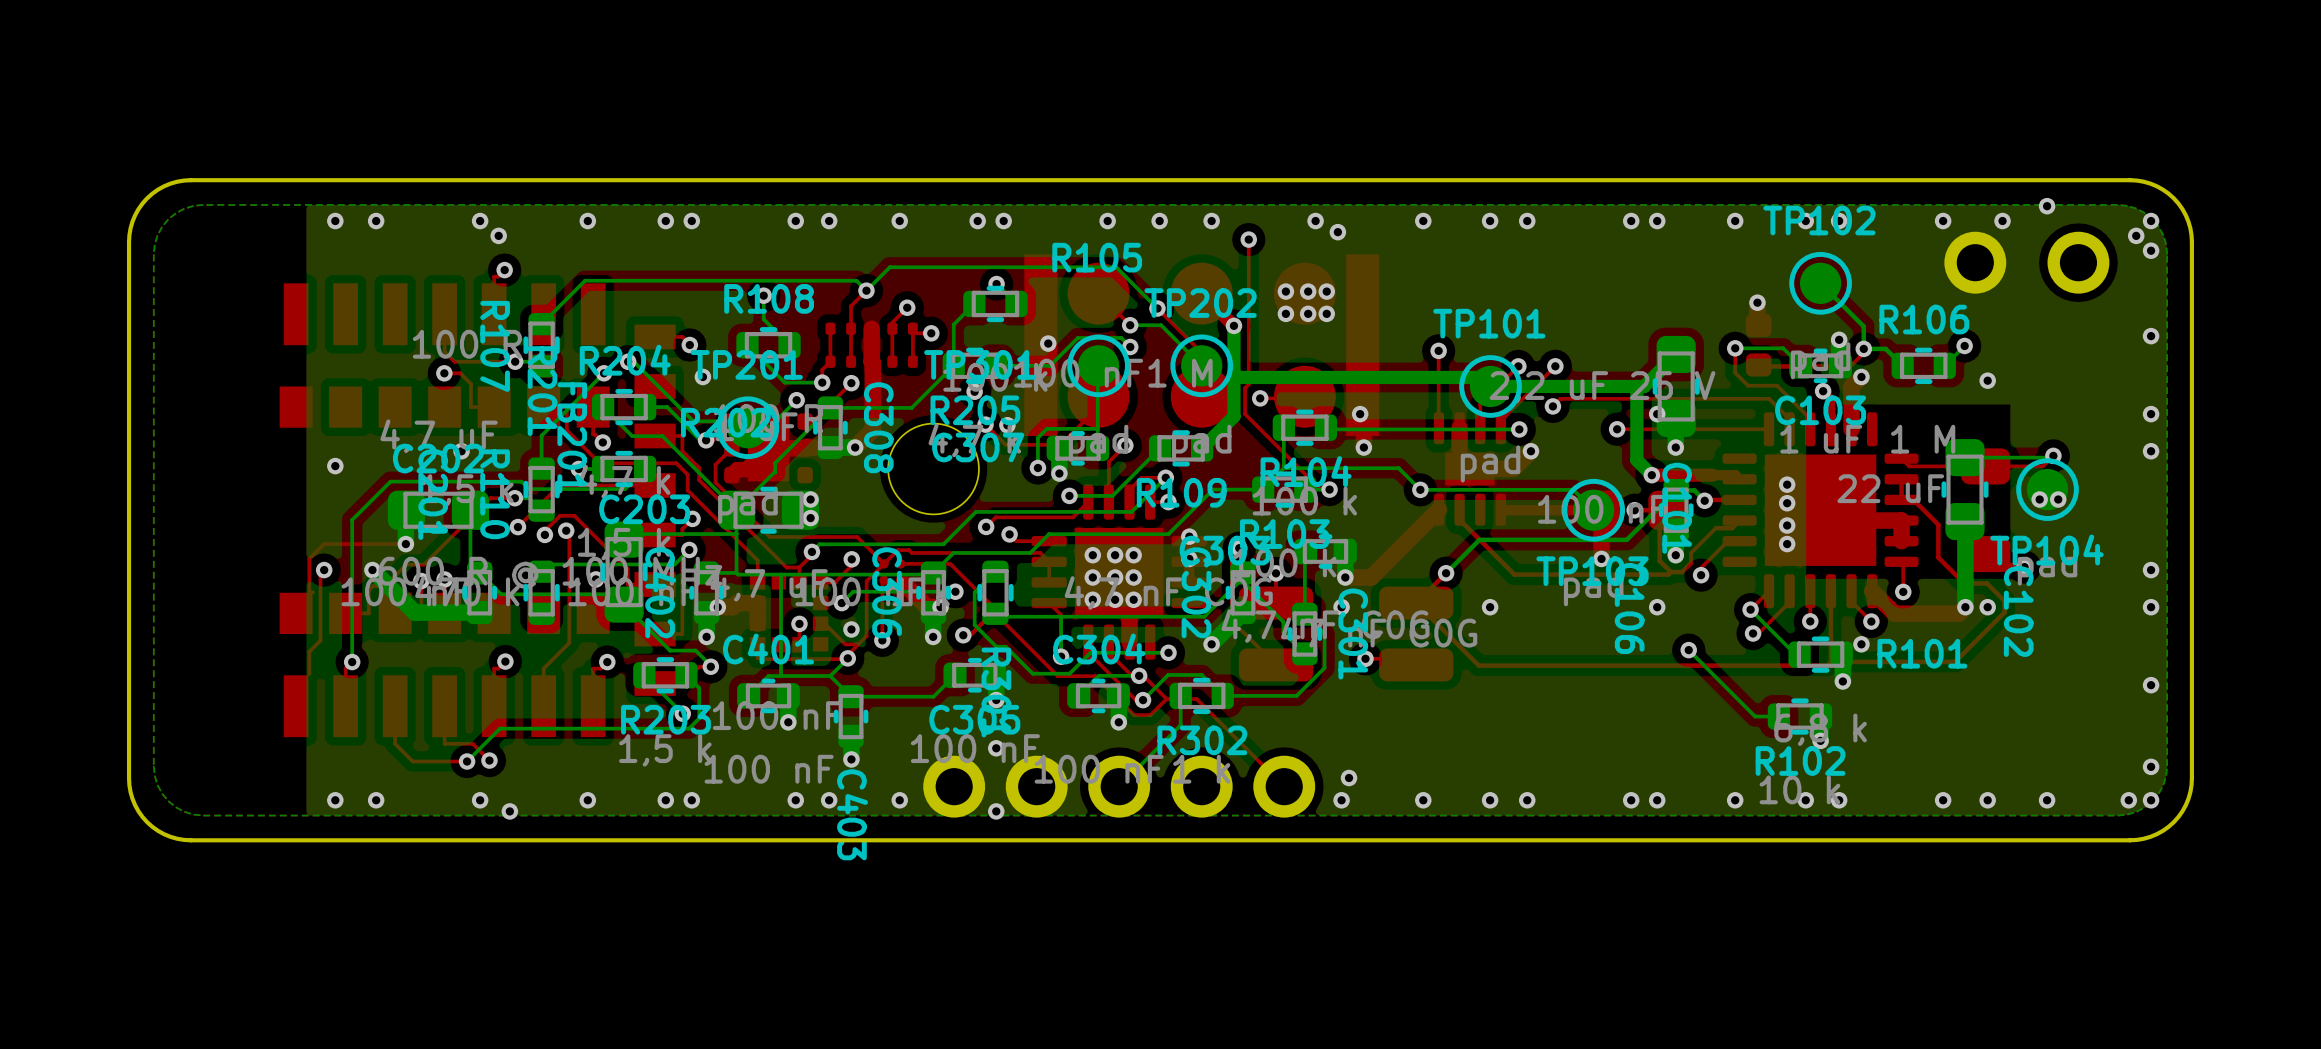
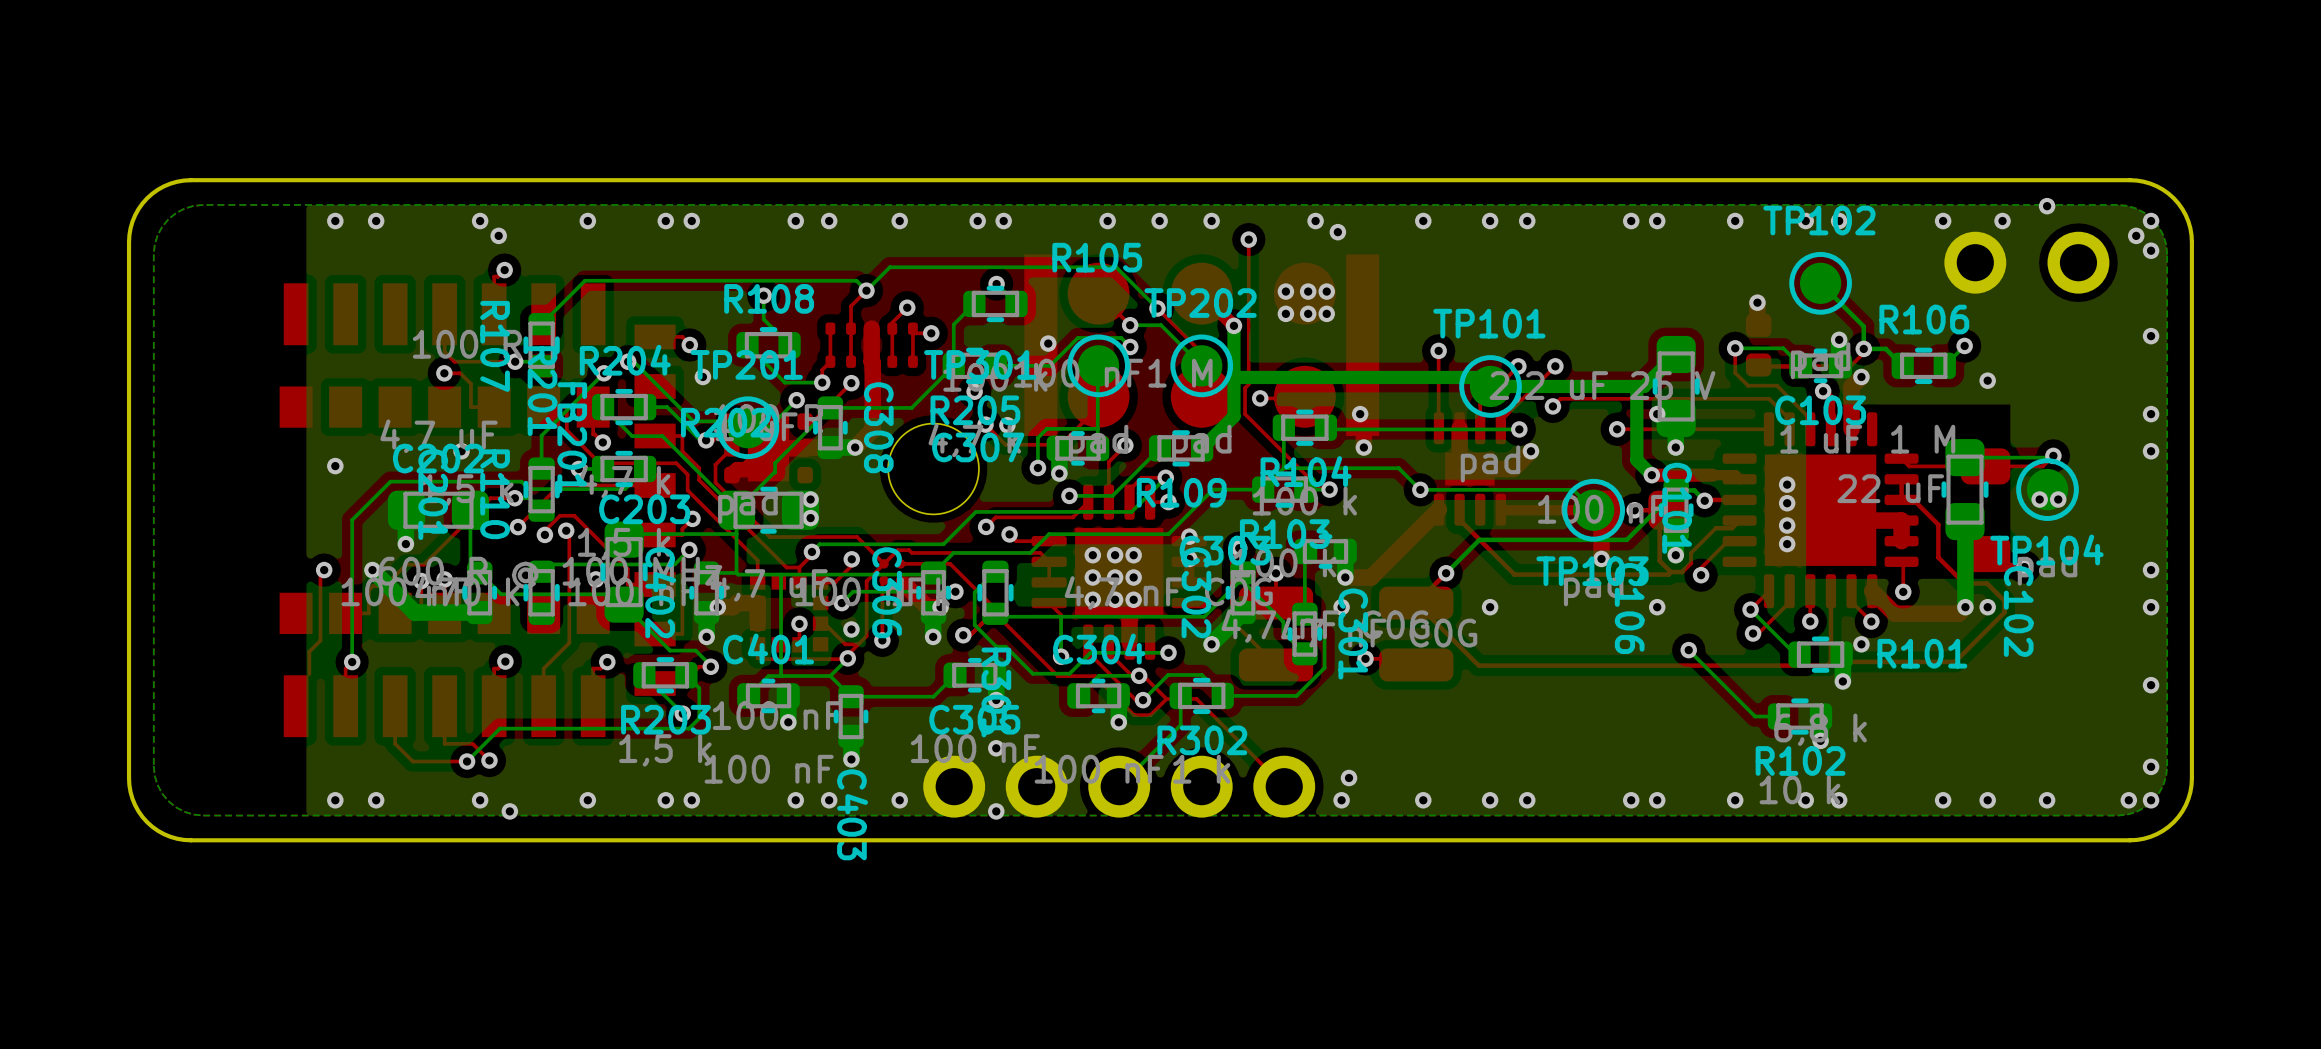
top track: (405, 544) (324, 544) (309, 558) (309, 592) (313, 592) -> none

